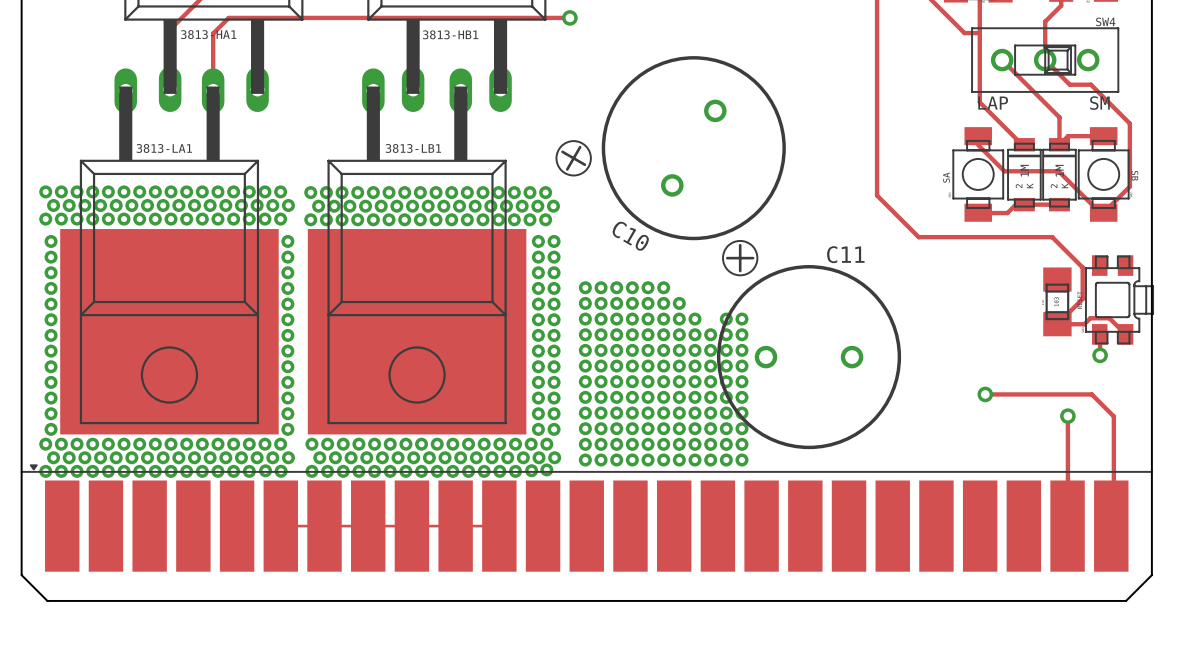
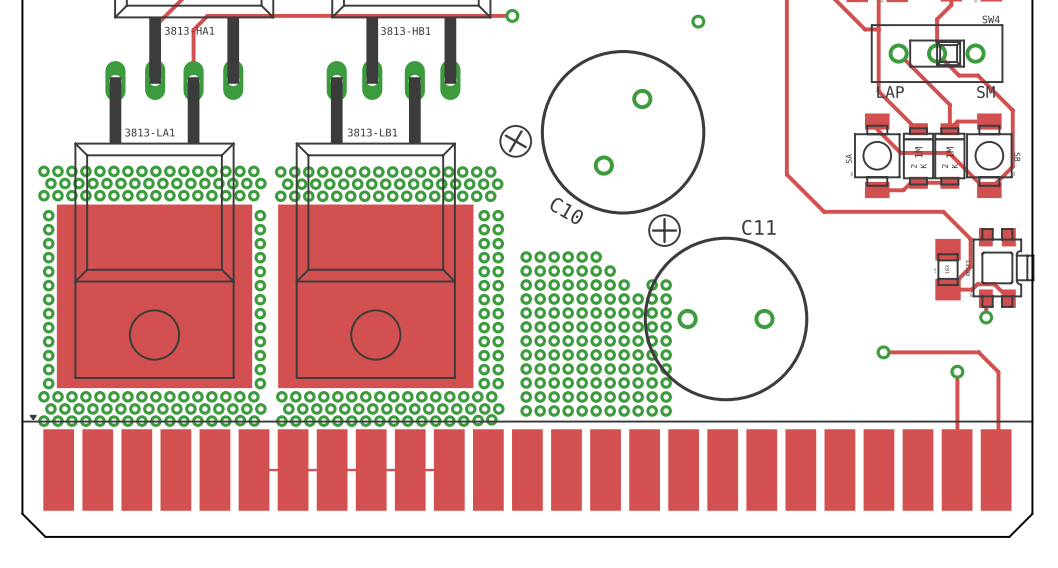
via: none -> (698, 21)

